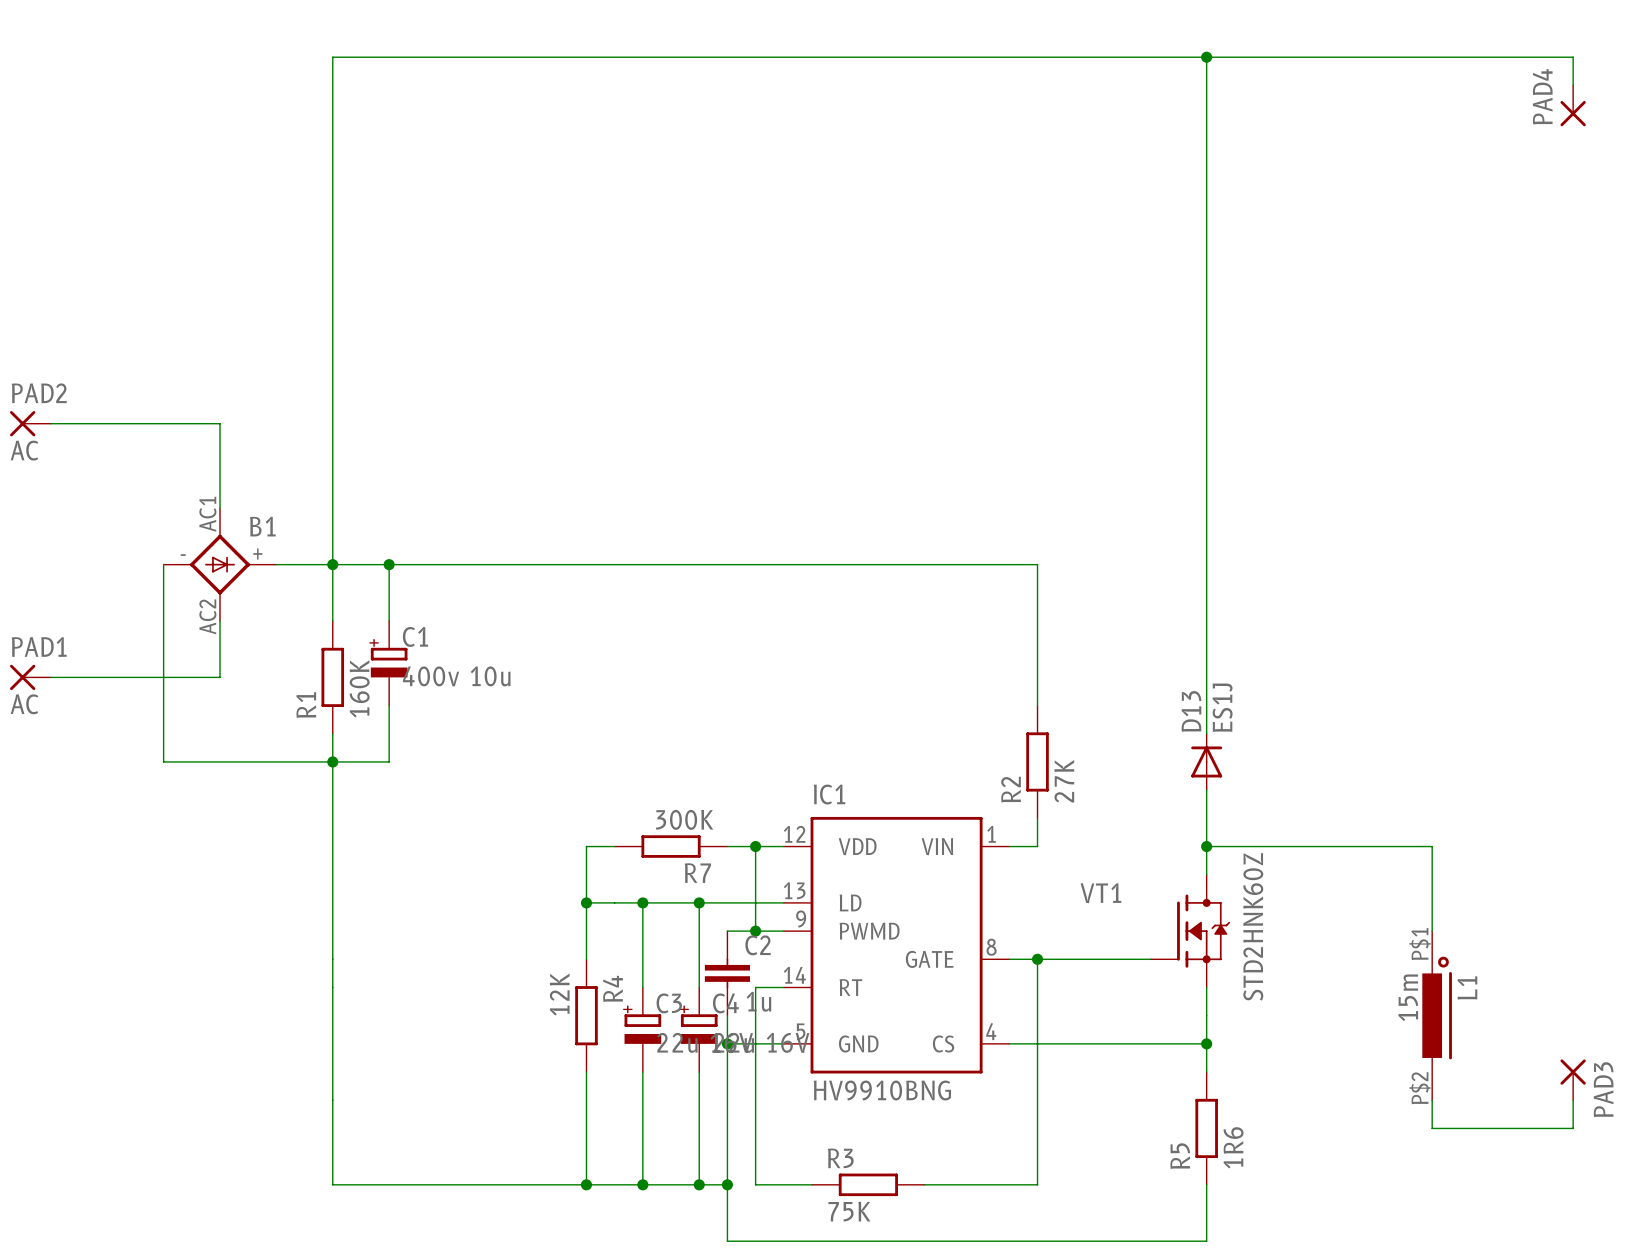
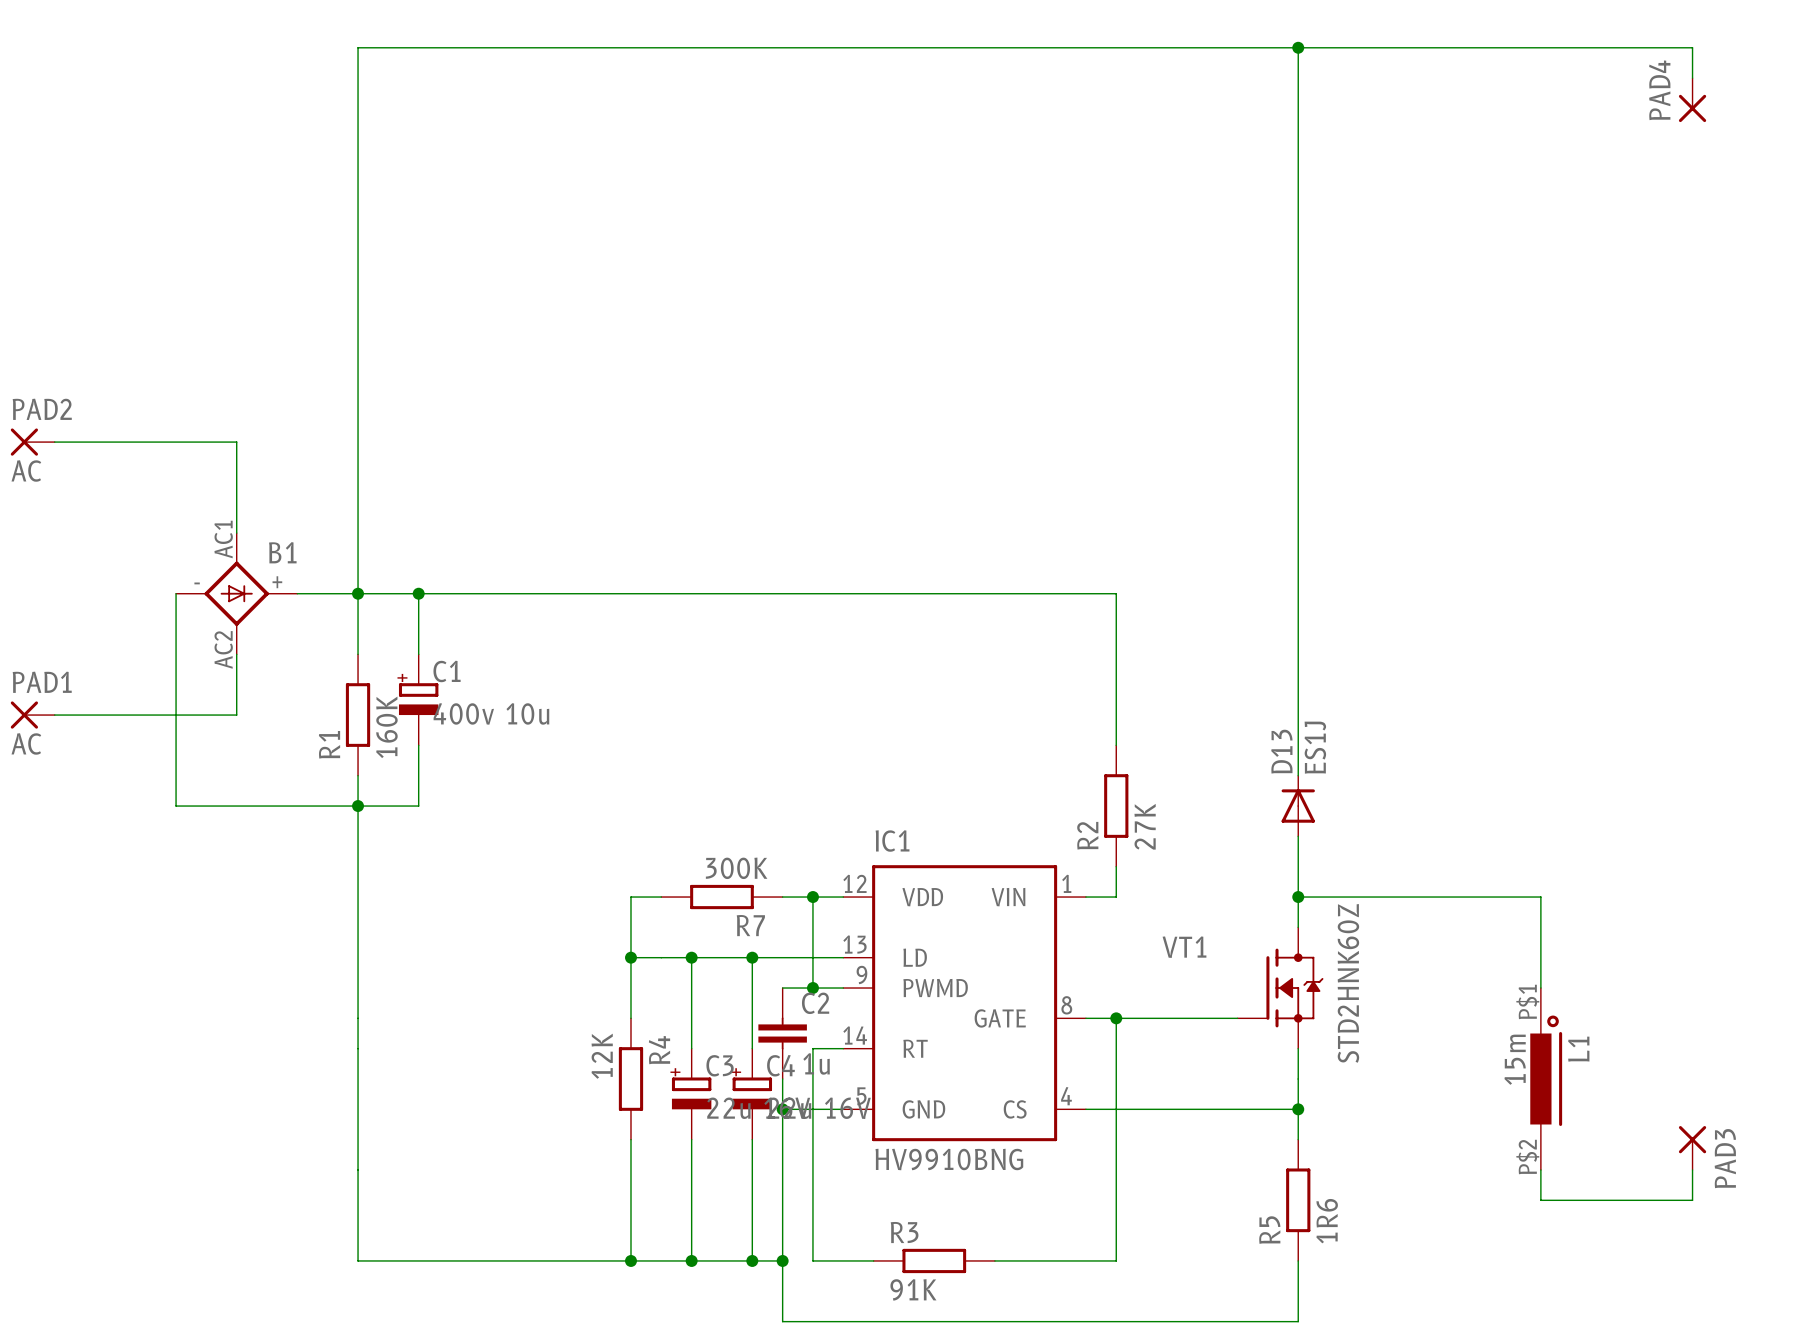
R3 value: 75K (849, 1211) -> 91K (913, 1289)

